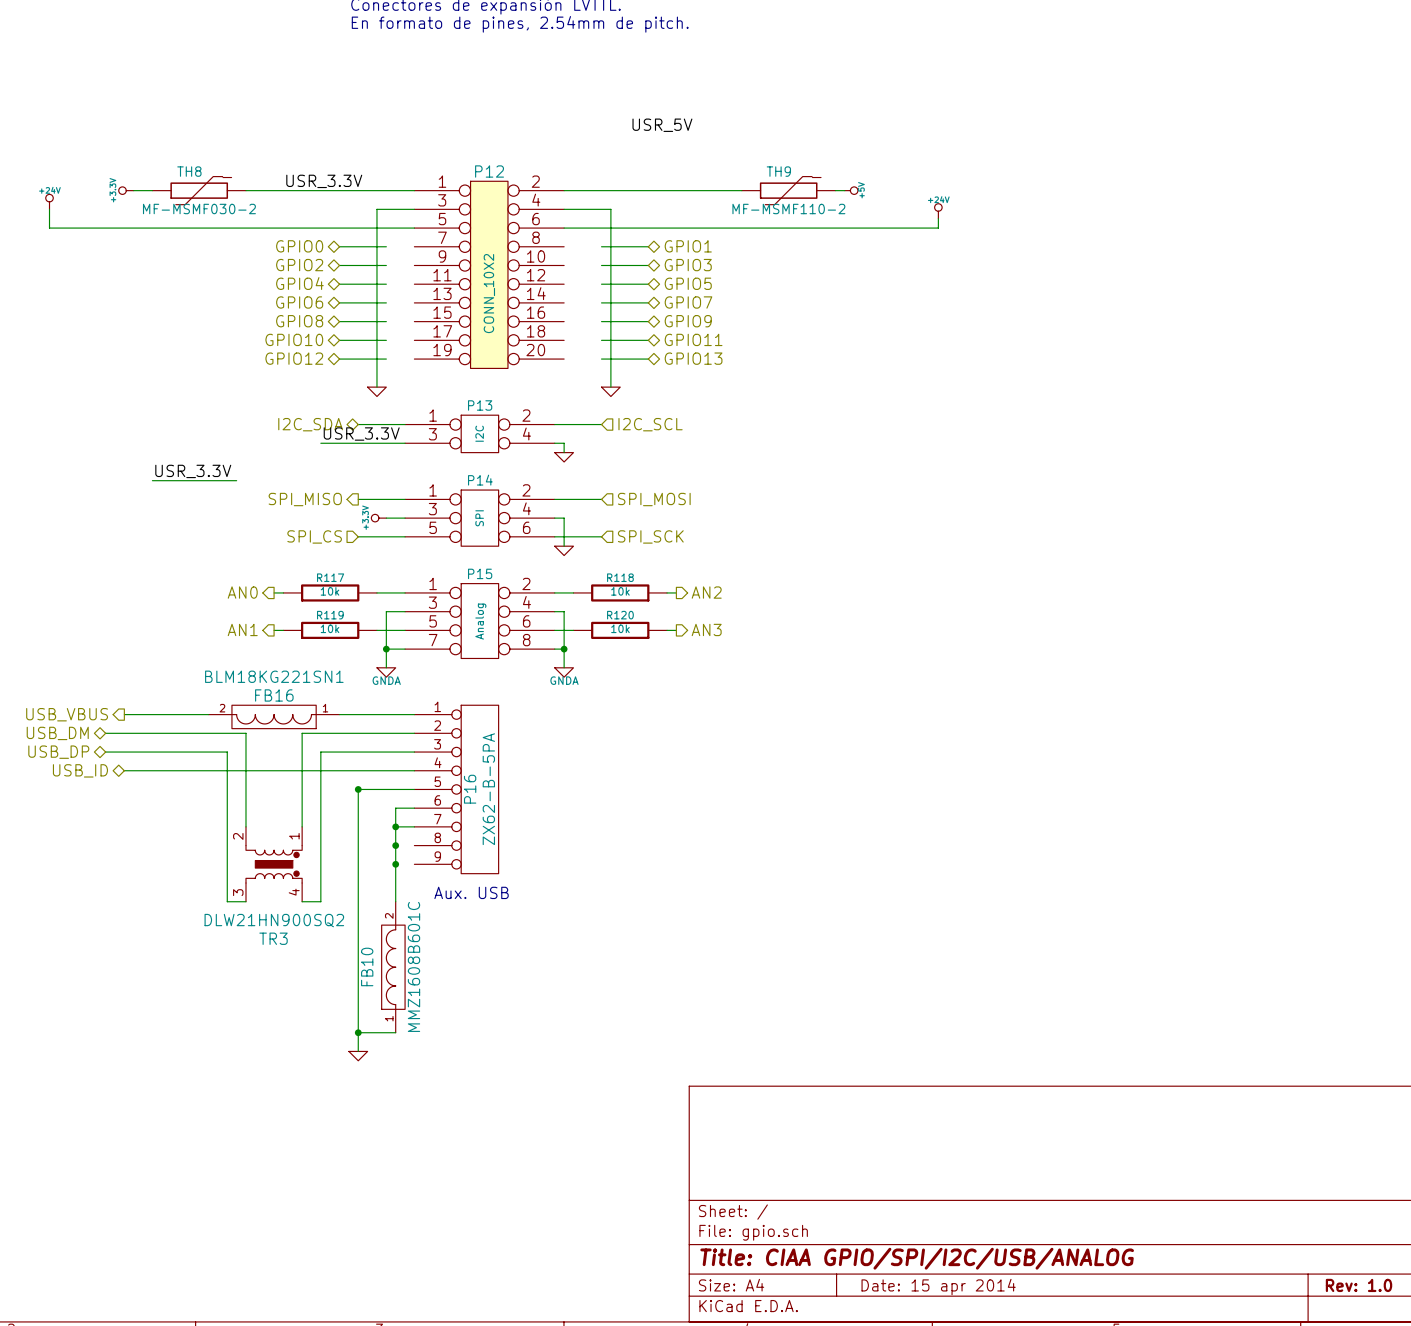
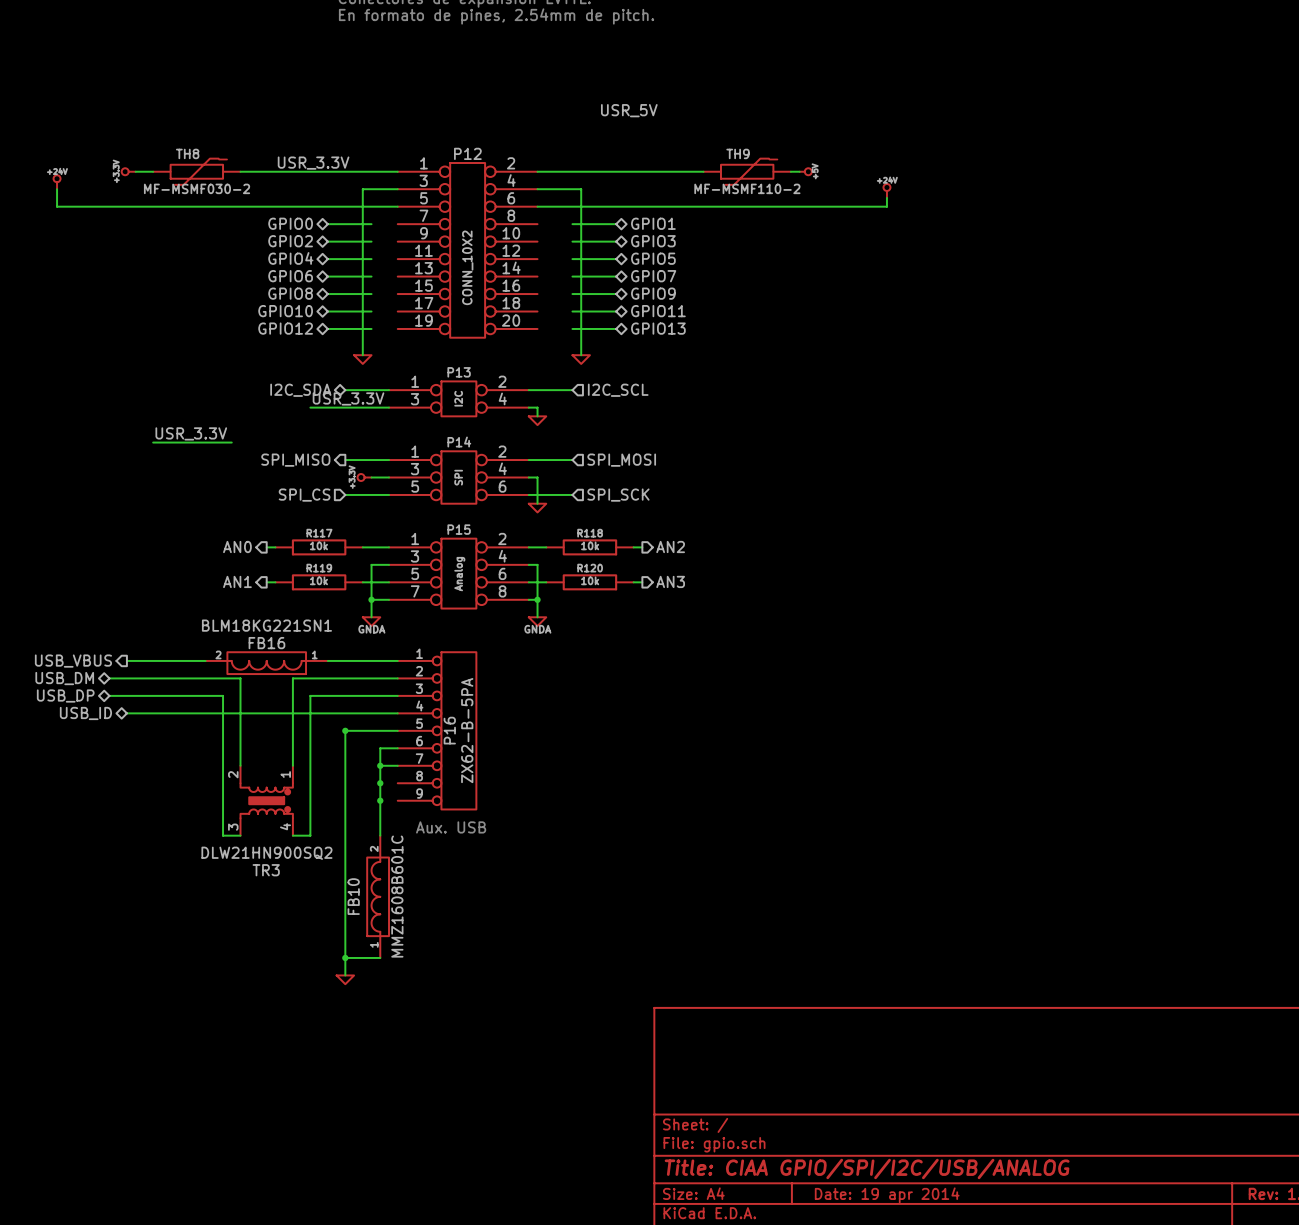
title block: Date: 15 apr 2014 (938, 1287) -> Date: 19 apr 2014 (887, 1195)

